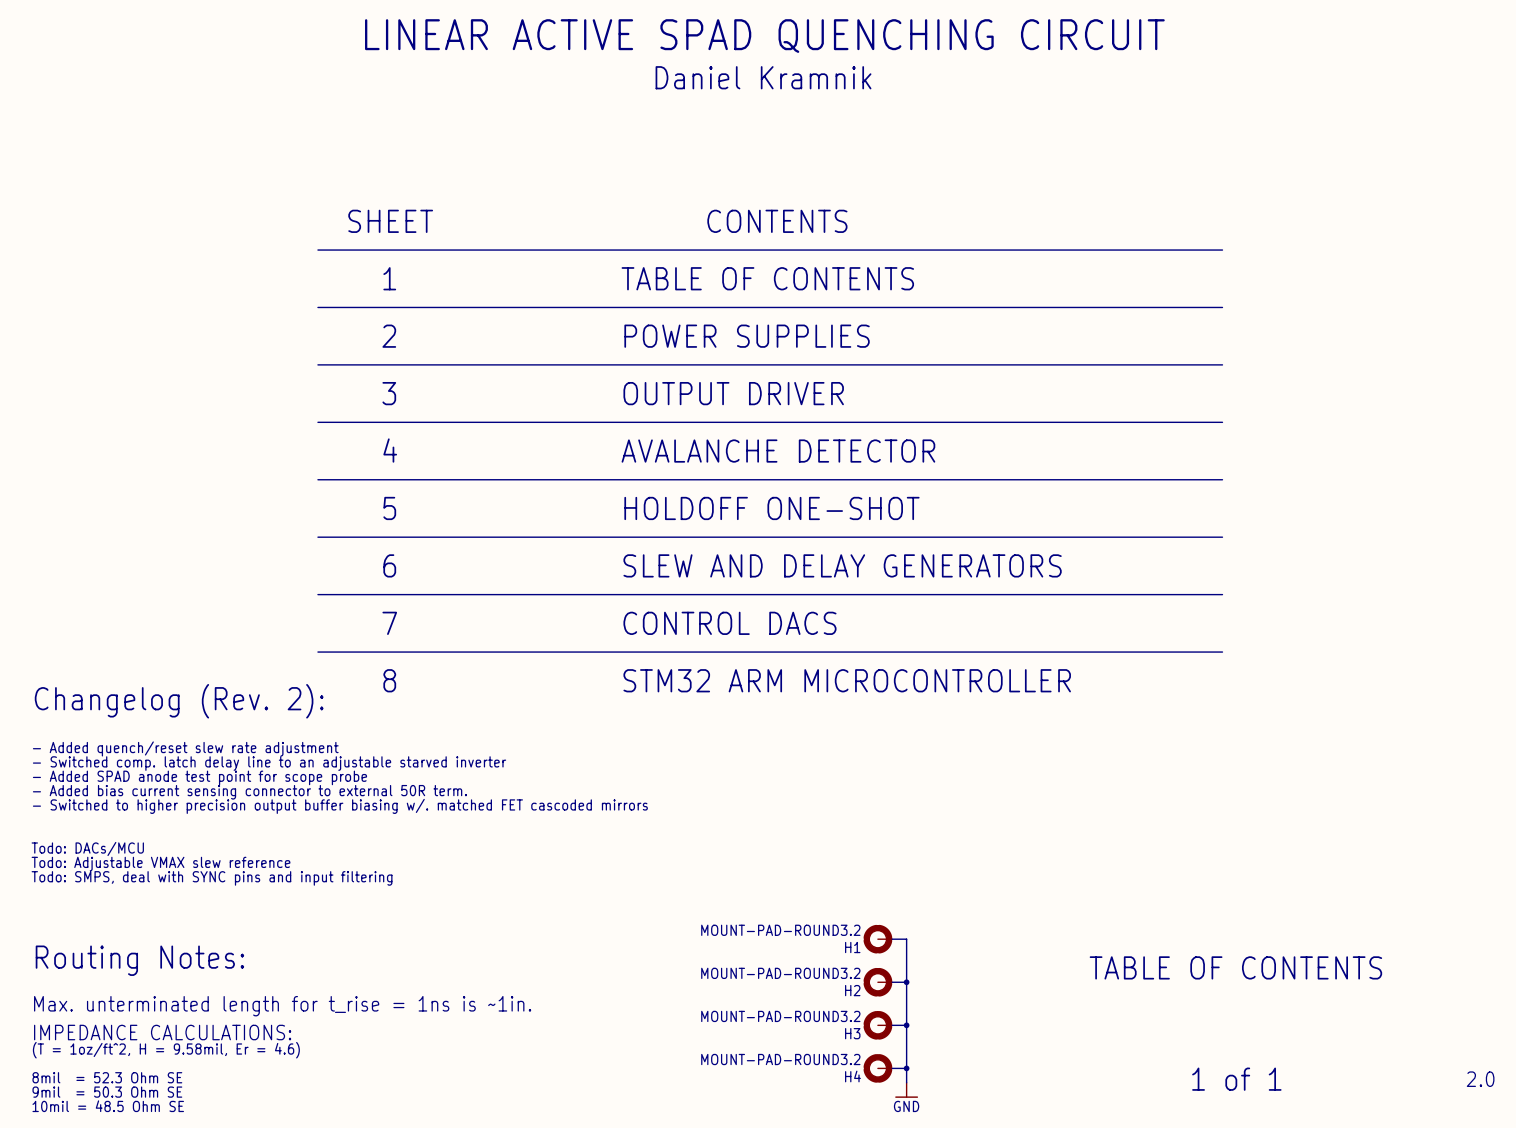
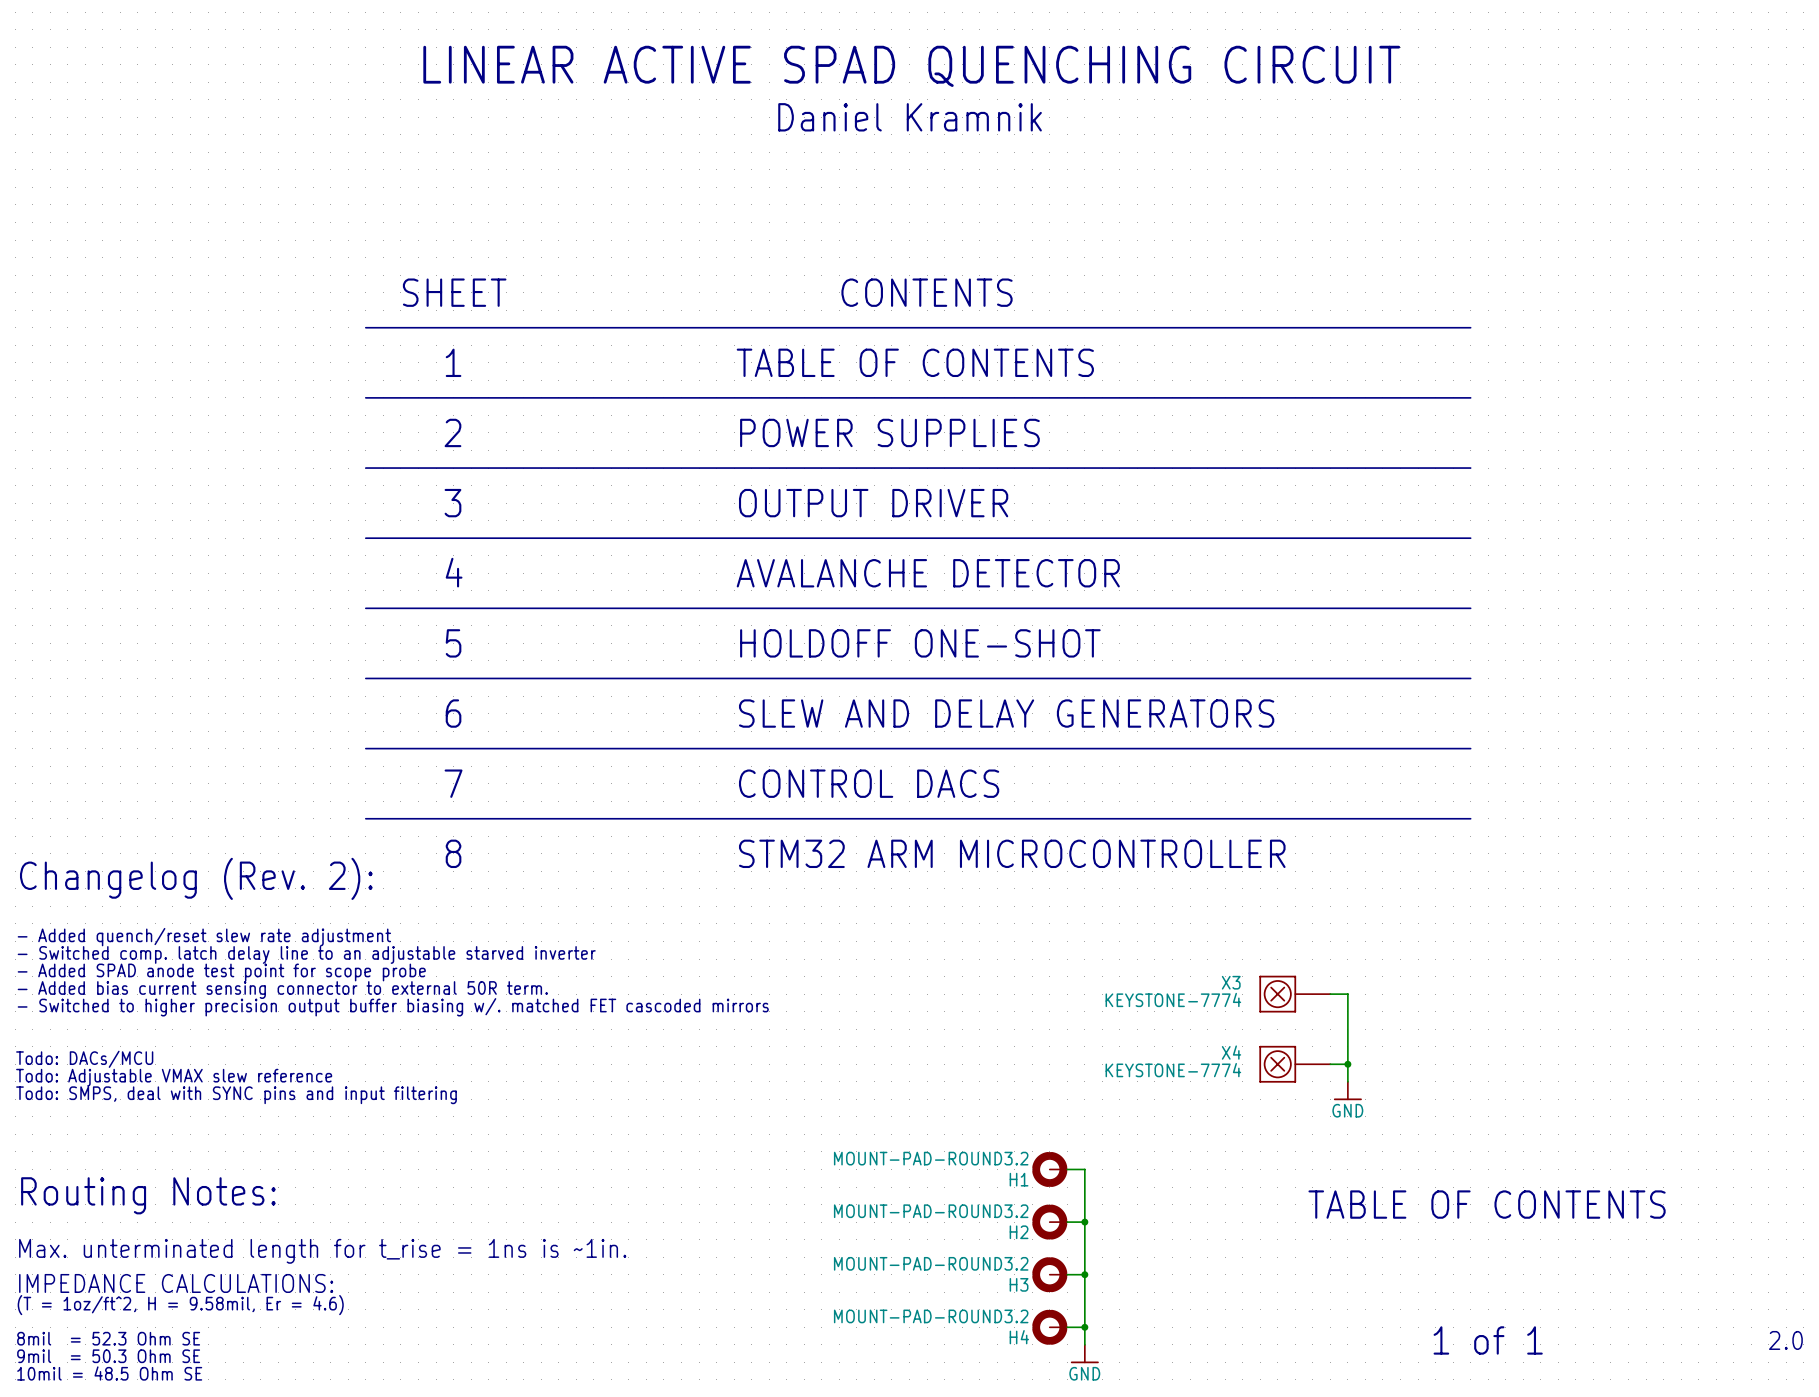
X3: none -> KEYSTONE-7774 (1294, 994)
wire: none -> (1330, 994) (1347, 994) (1347, 1081)
X4: none -> KEYSTONE-7774 (1294, 1064)
wire: none -> (1330, 1064) (1347, 1064)
junction: none -> (1347, 1064)
power symbol: none -> GND (1347, 1091)

